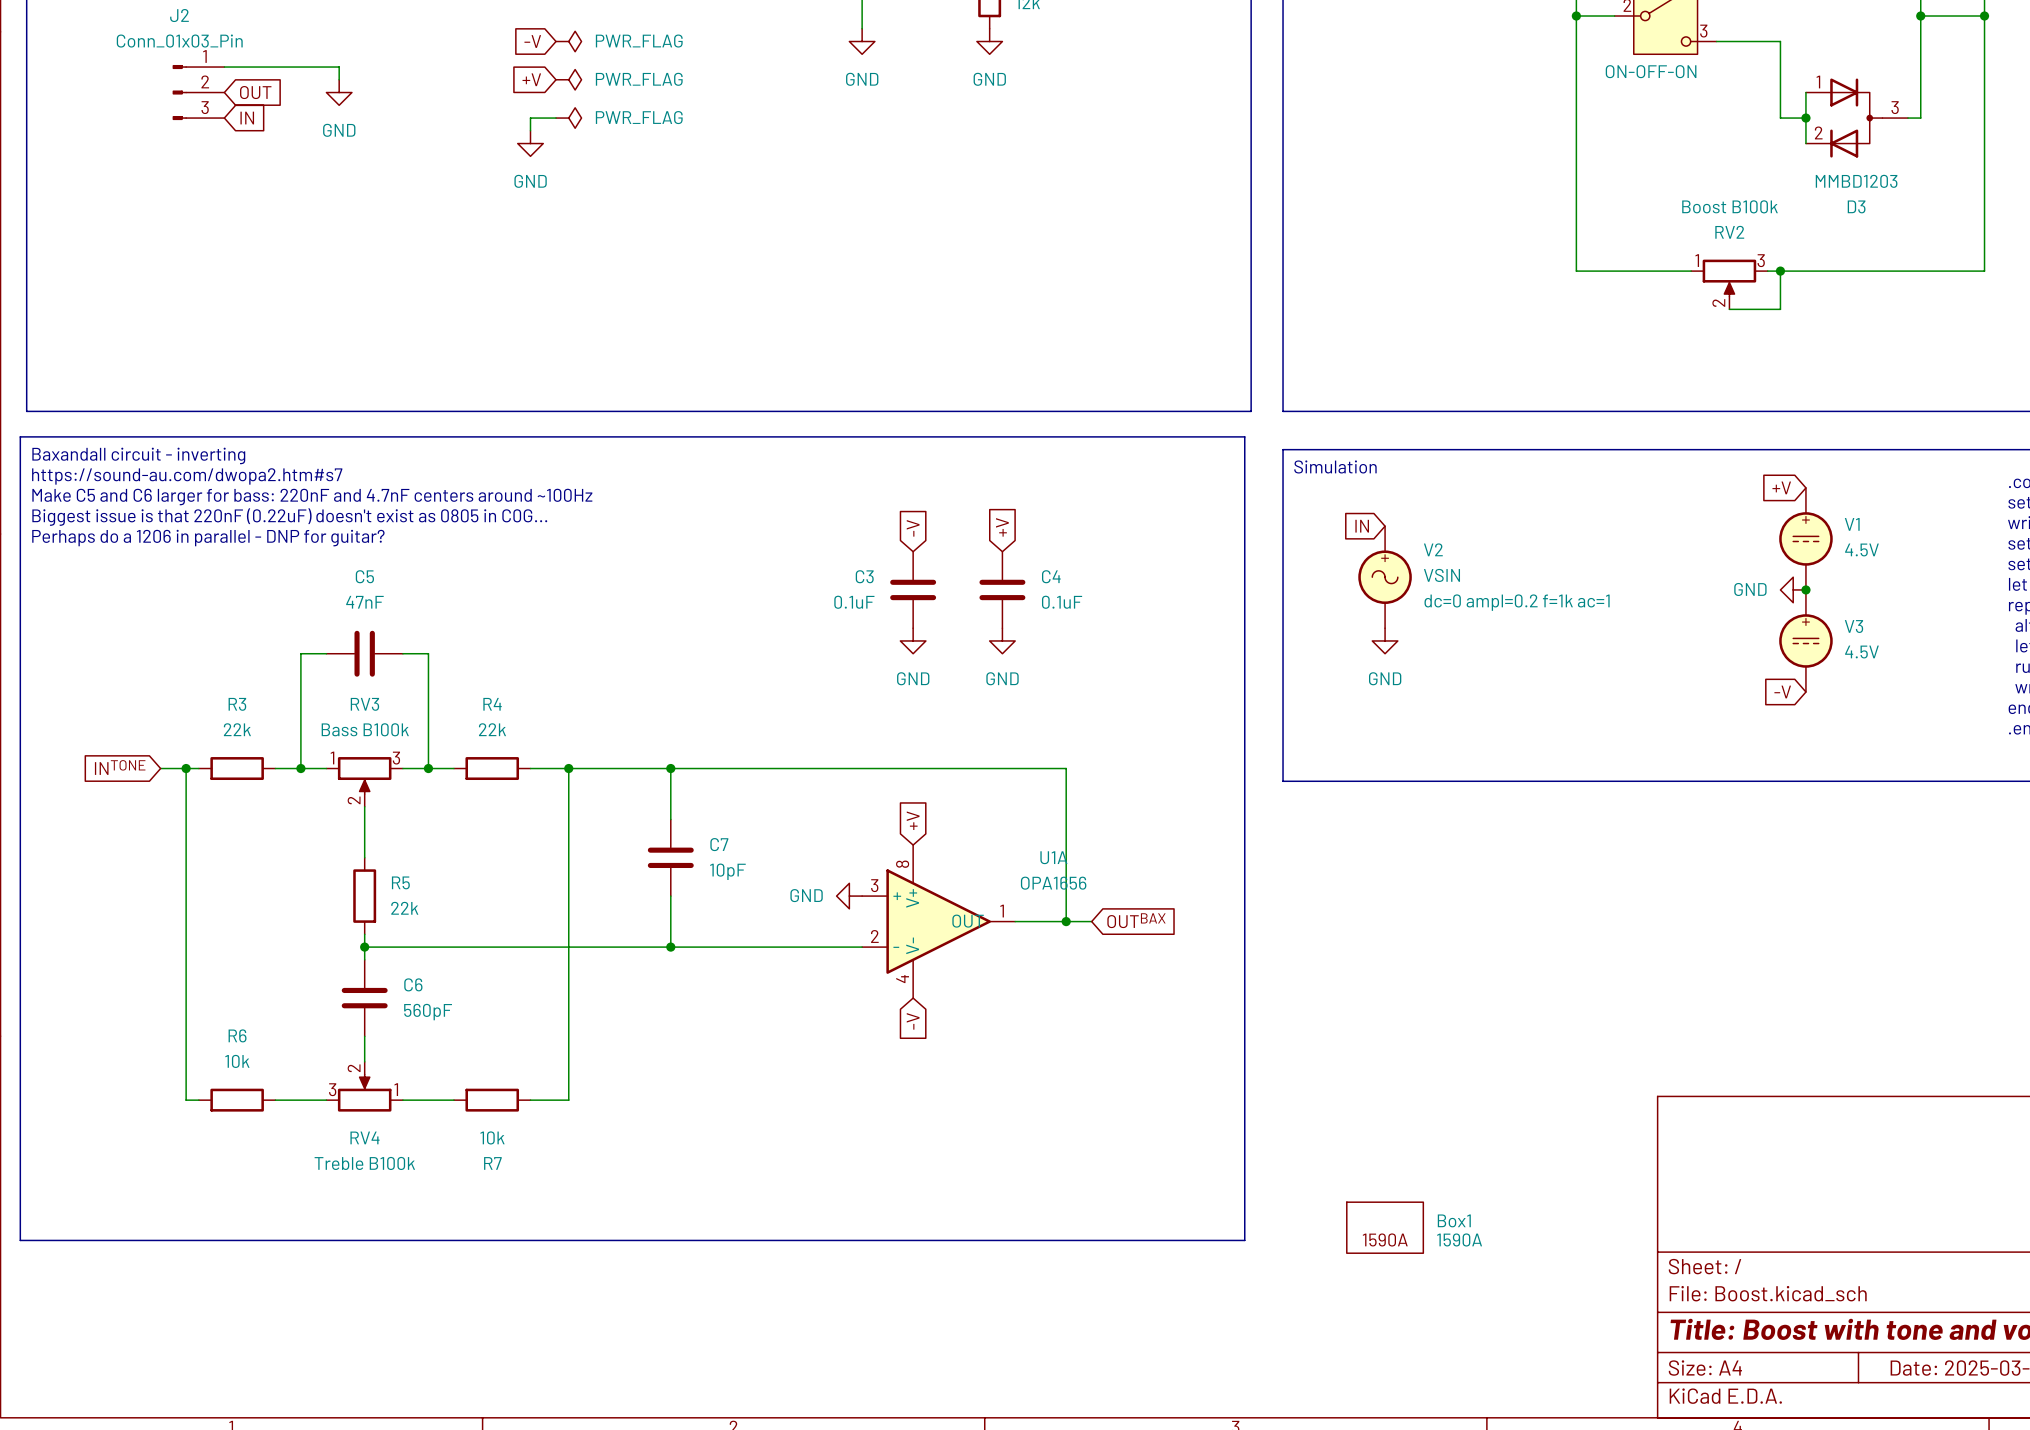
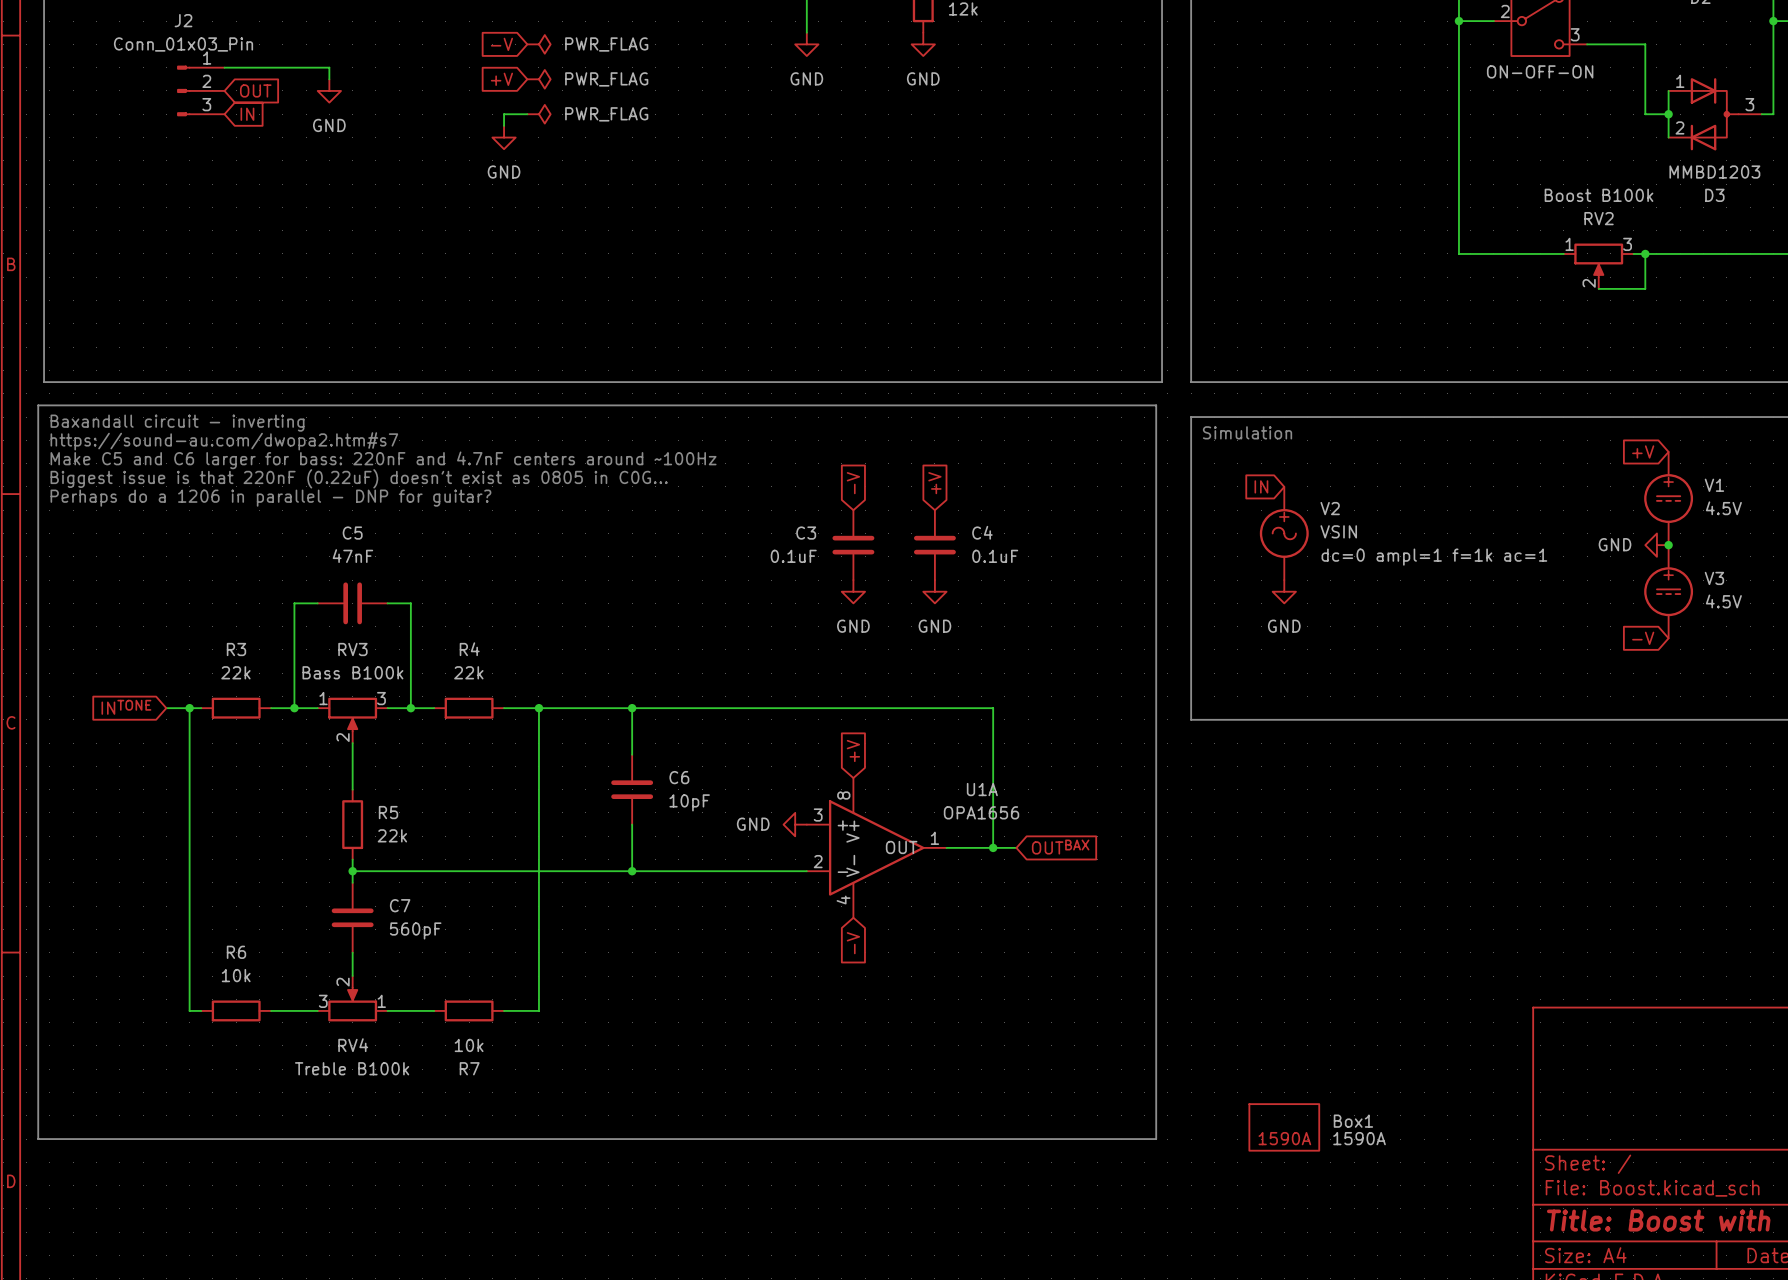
V2 text: dc=0 ampl=0.2 f=1k ac=1 (1517, 602) -> dc=0 ampl=1 f=1k ac=1 (1434, 557)
C7 name: C7 (719, 844) -> C6 (679, 777)
C6 name: C6 (413, 984) -> C7 (400, 905)

